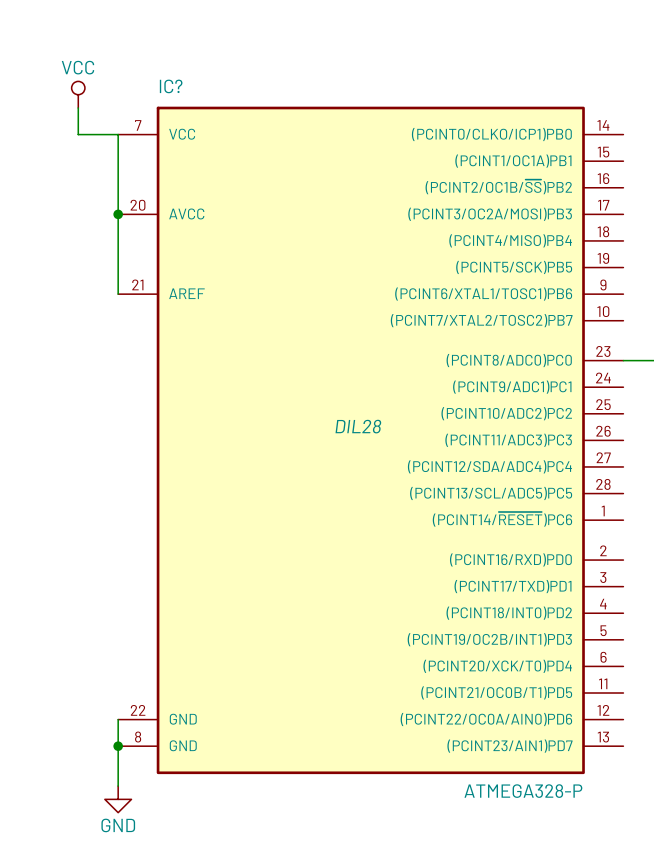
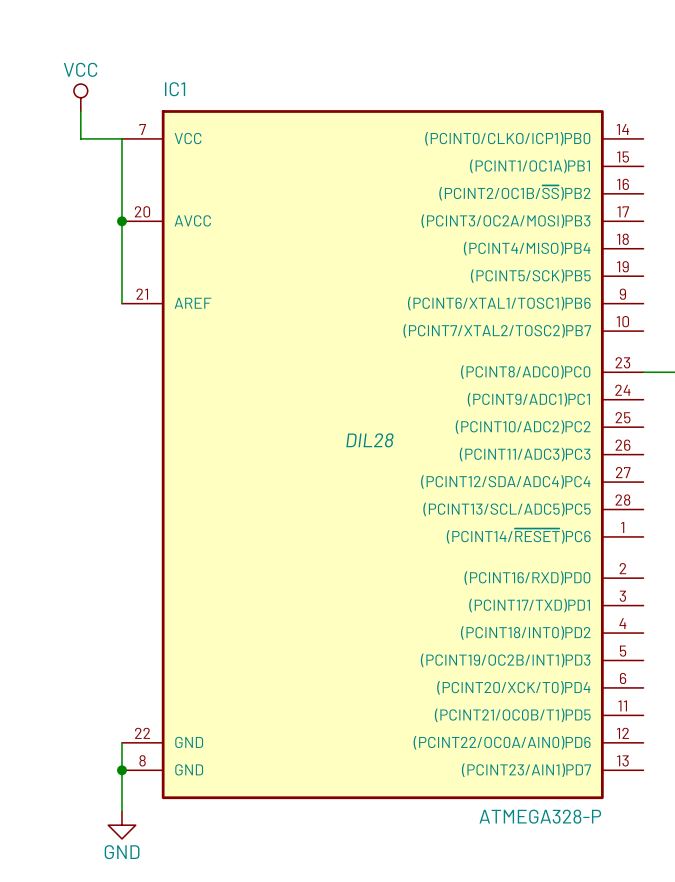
IC? name: IC? (171, 86) -> IC1 (175, 89)

